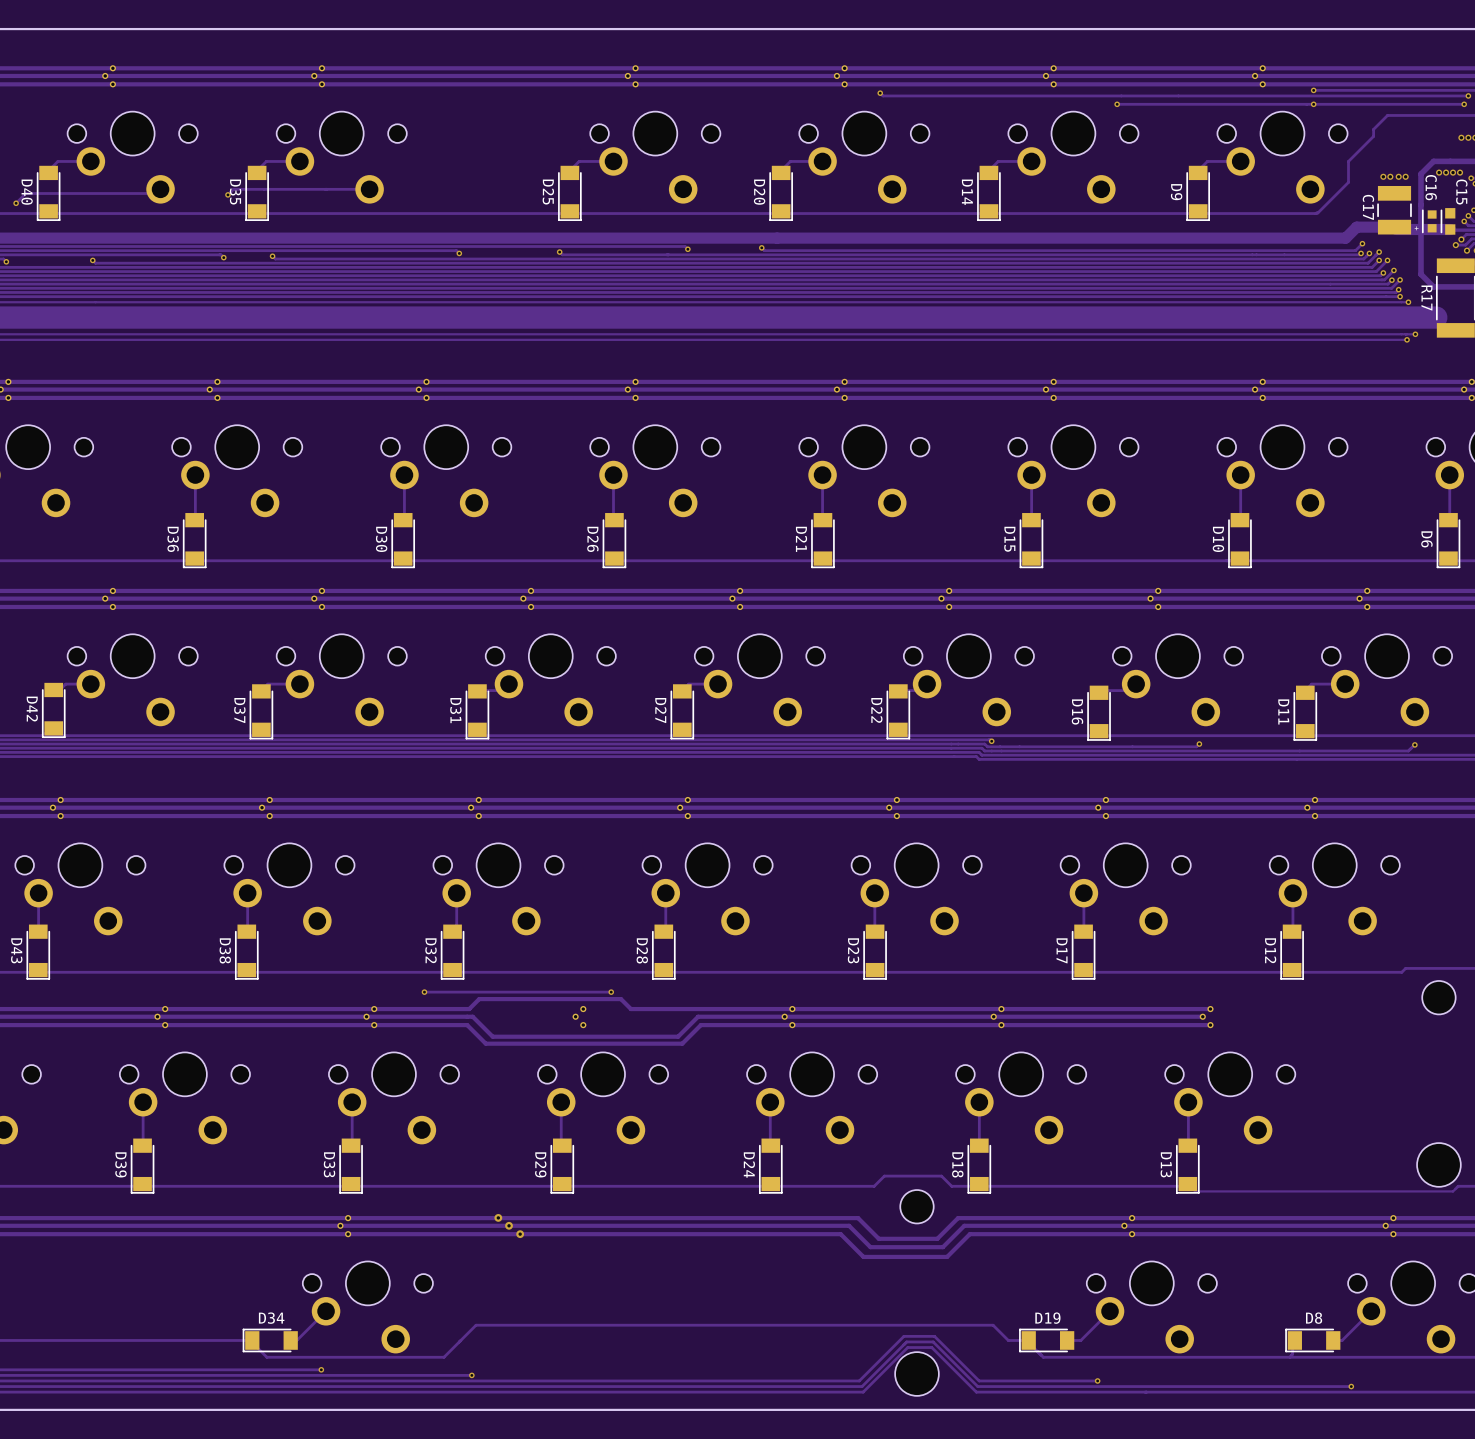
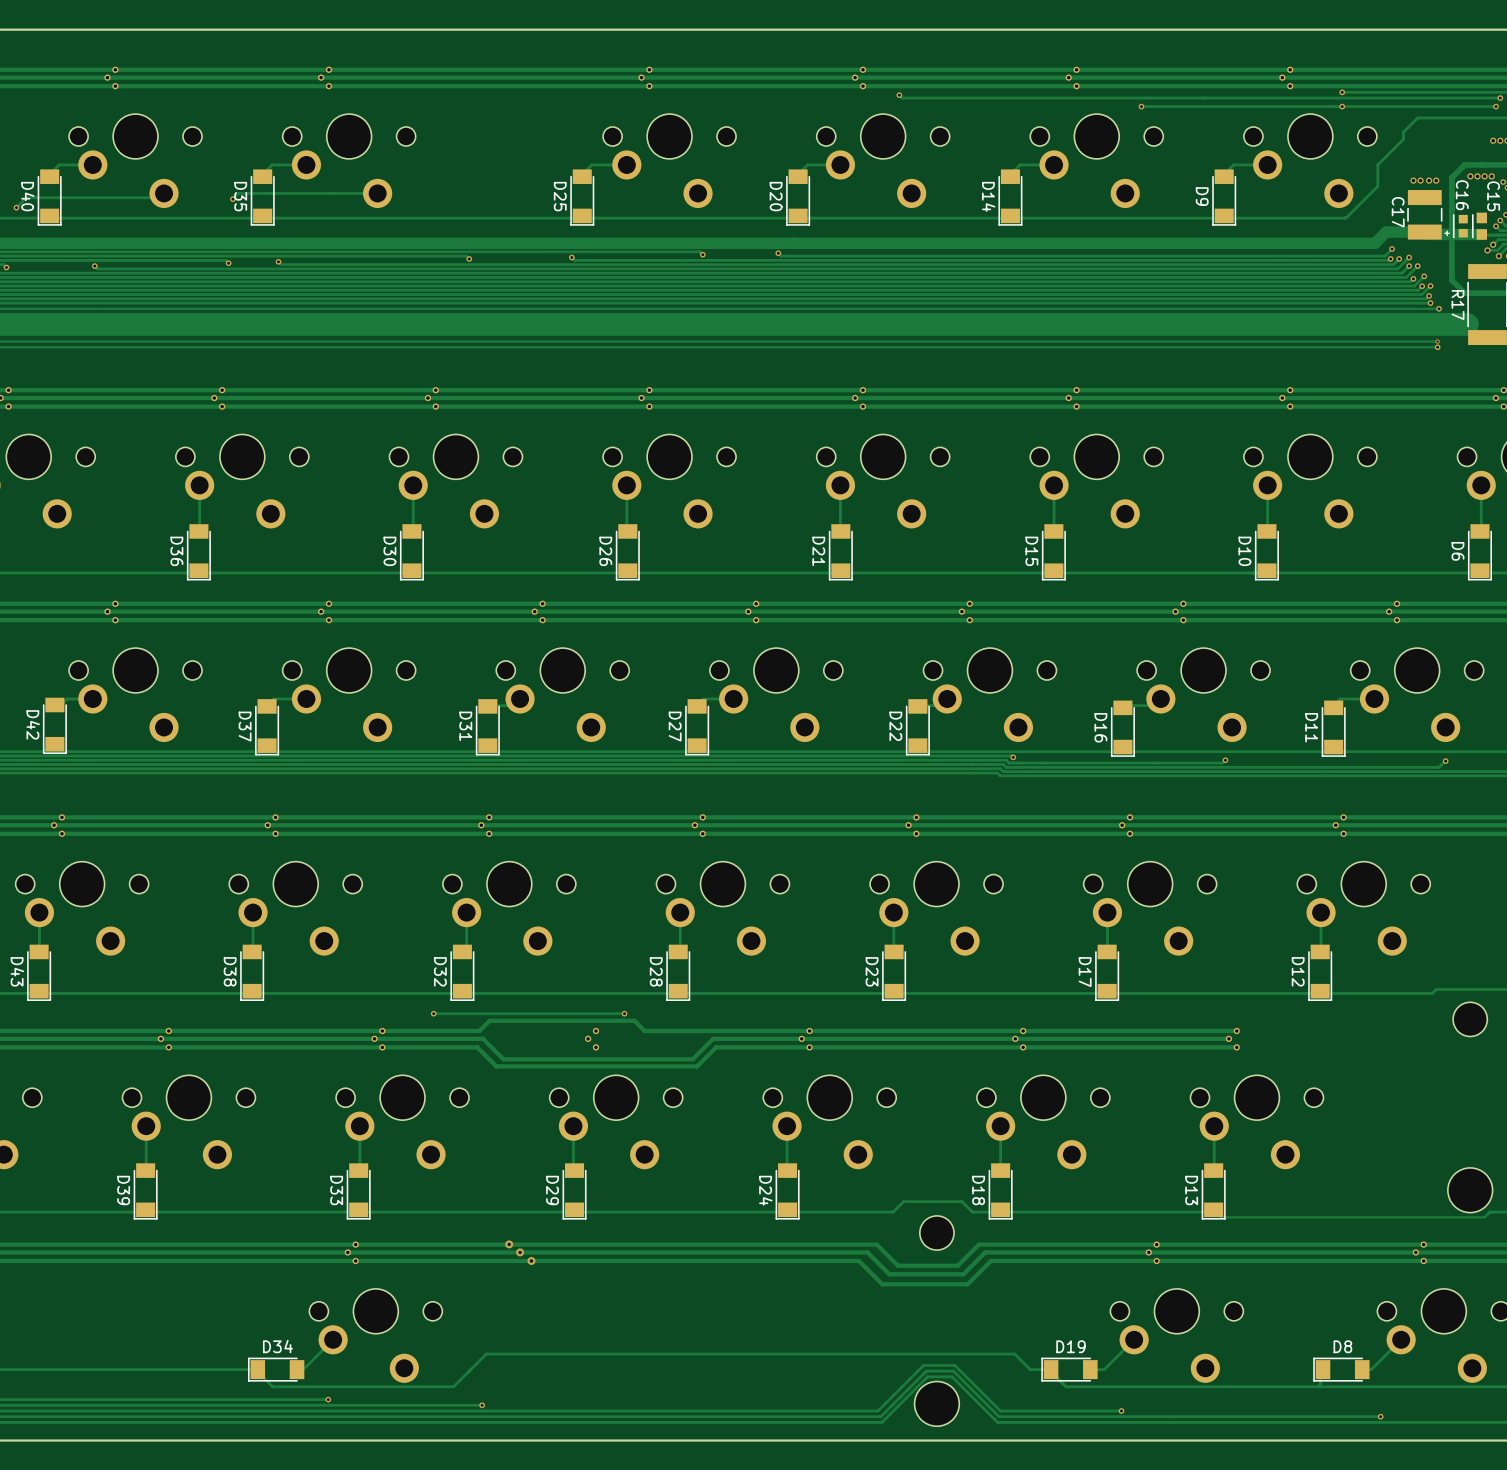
via: none -> (1437, 341)
track: (1415, 334) (1407, 334) -> none
via: (1415, 334) -> none

